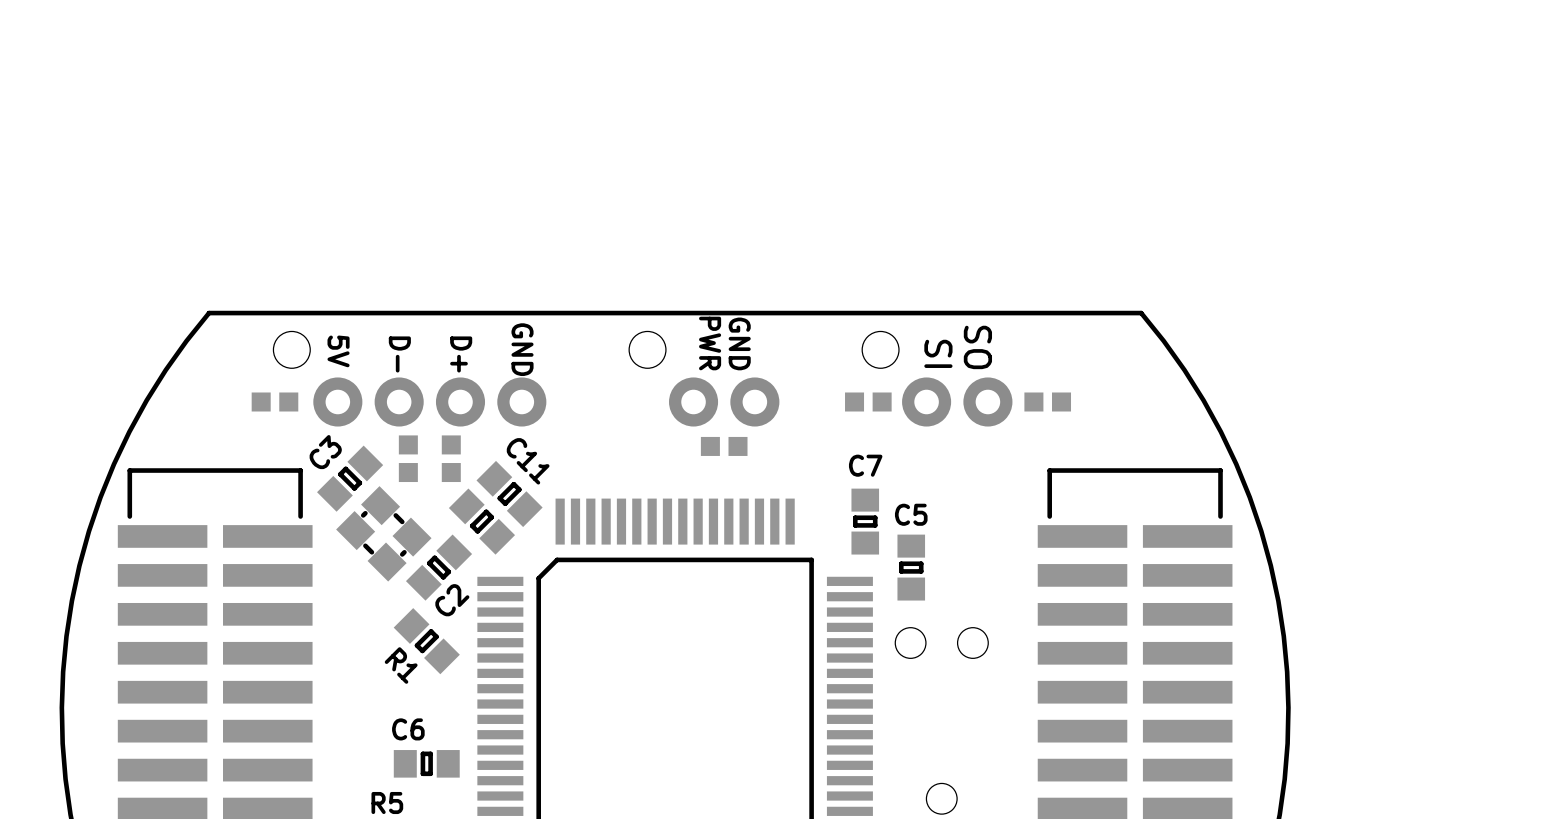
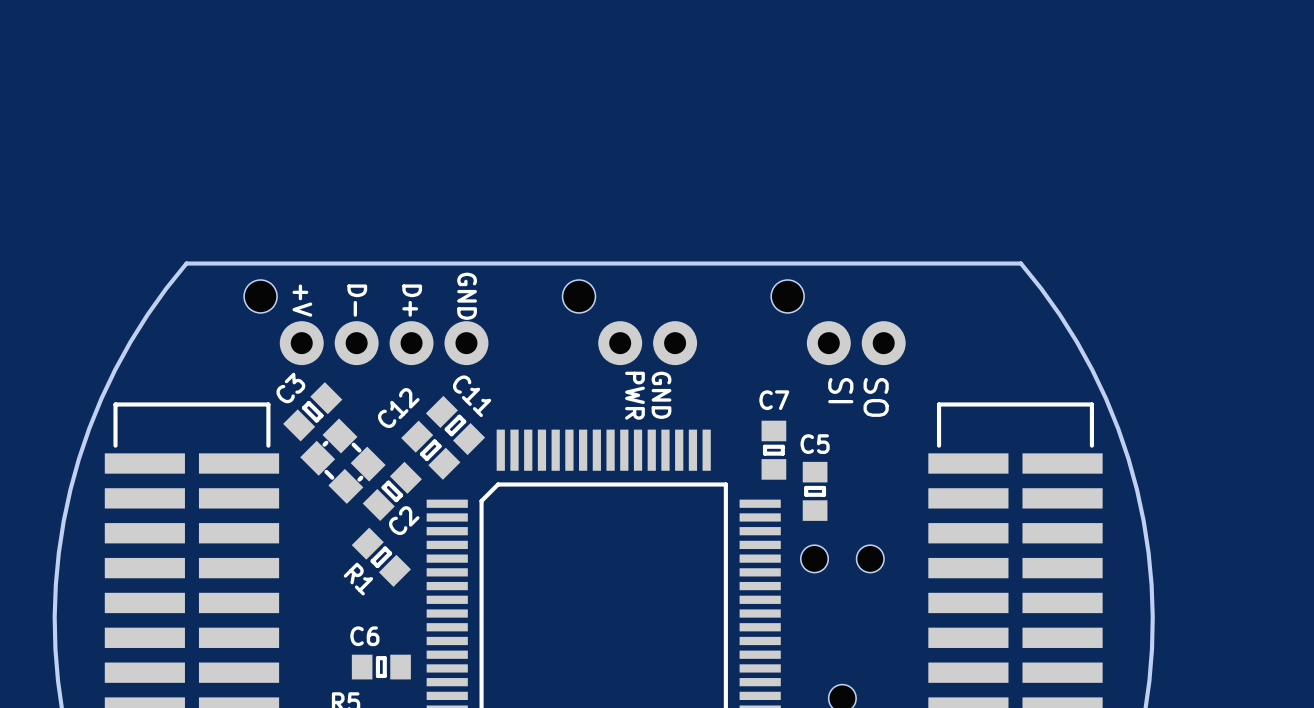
text position: PWR (710, 343) -> PWR (634, 395)
text position: GND (739, 343) -> GND (661, 395)
text position: SO (977, 347) -> SO (876, 397)
text: 5V (338, 351) -> +V (302, 300)
text position: SI (938, 353) -> SI (840, 390)
part: (274, 401) -> none
part: (868, 401) -> none
part: (1047, 401) -> none
part: (724, 446) -> none
part: (408, 458) -> none
part: (451, 458) -> none
text: none -> C12 (398, 408)

